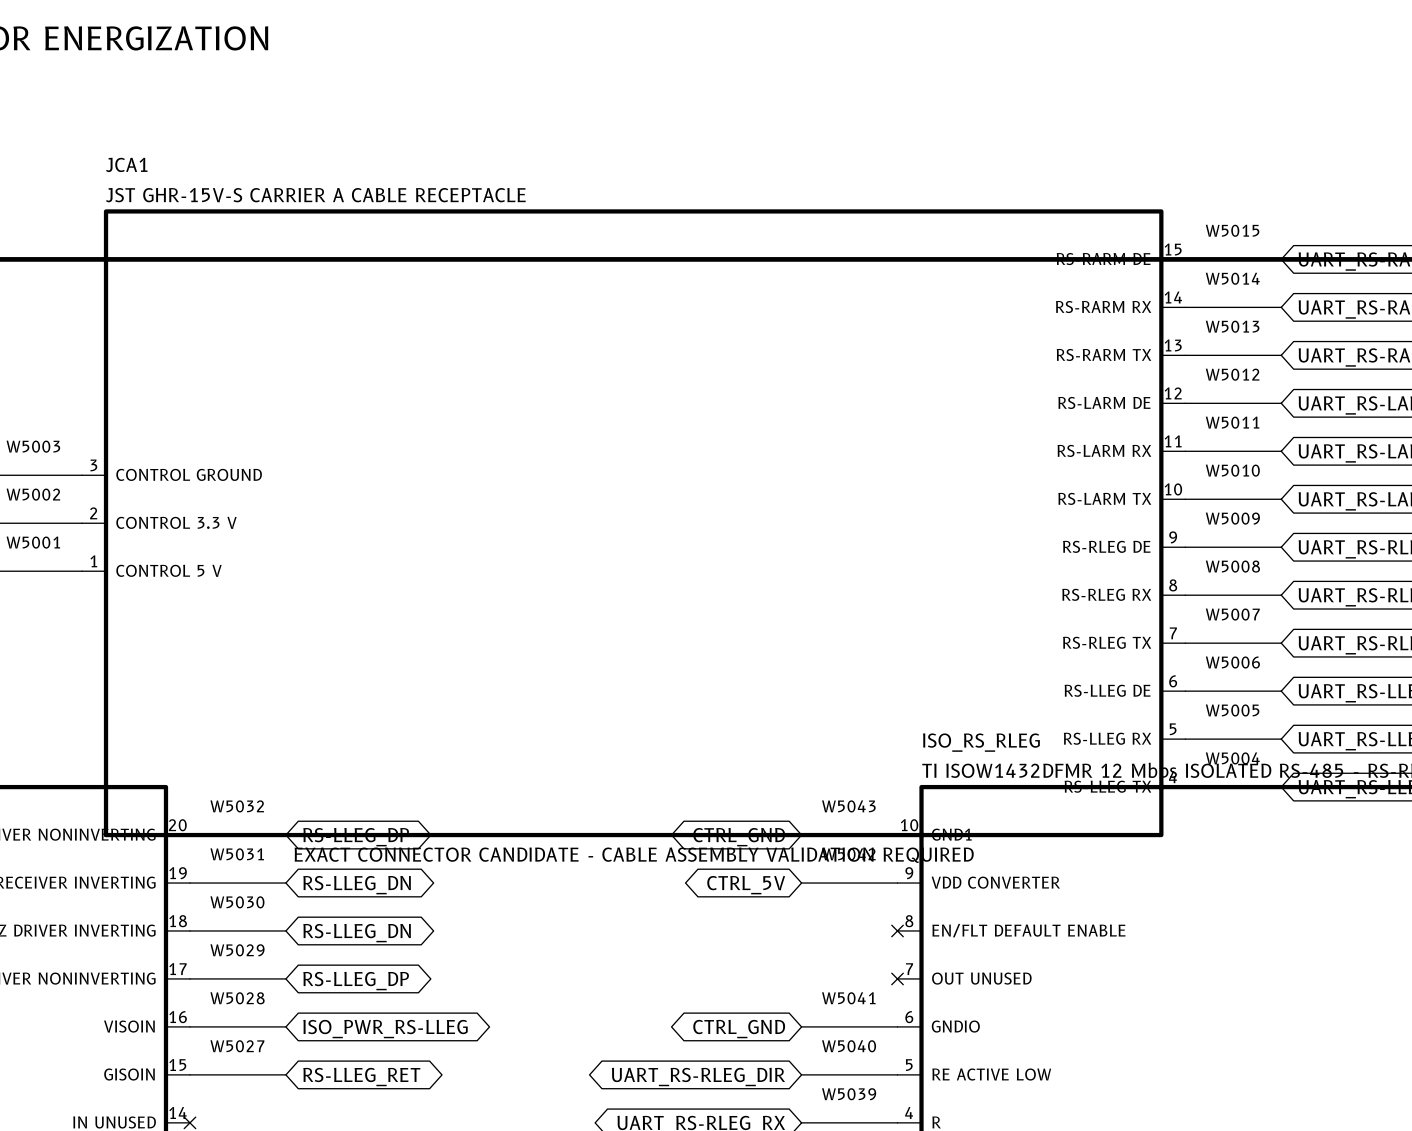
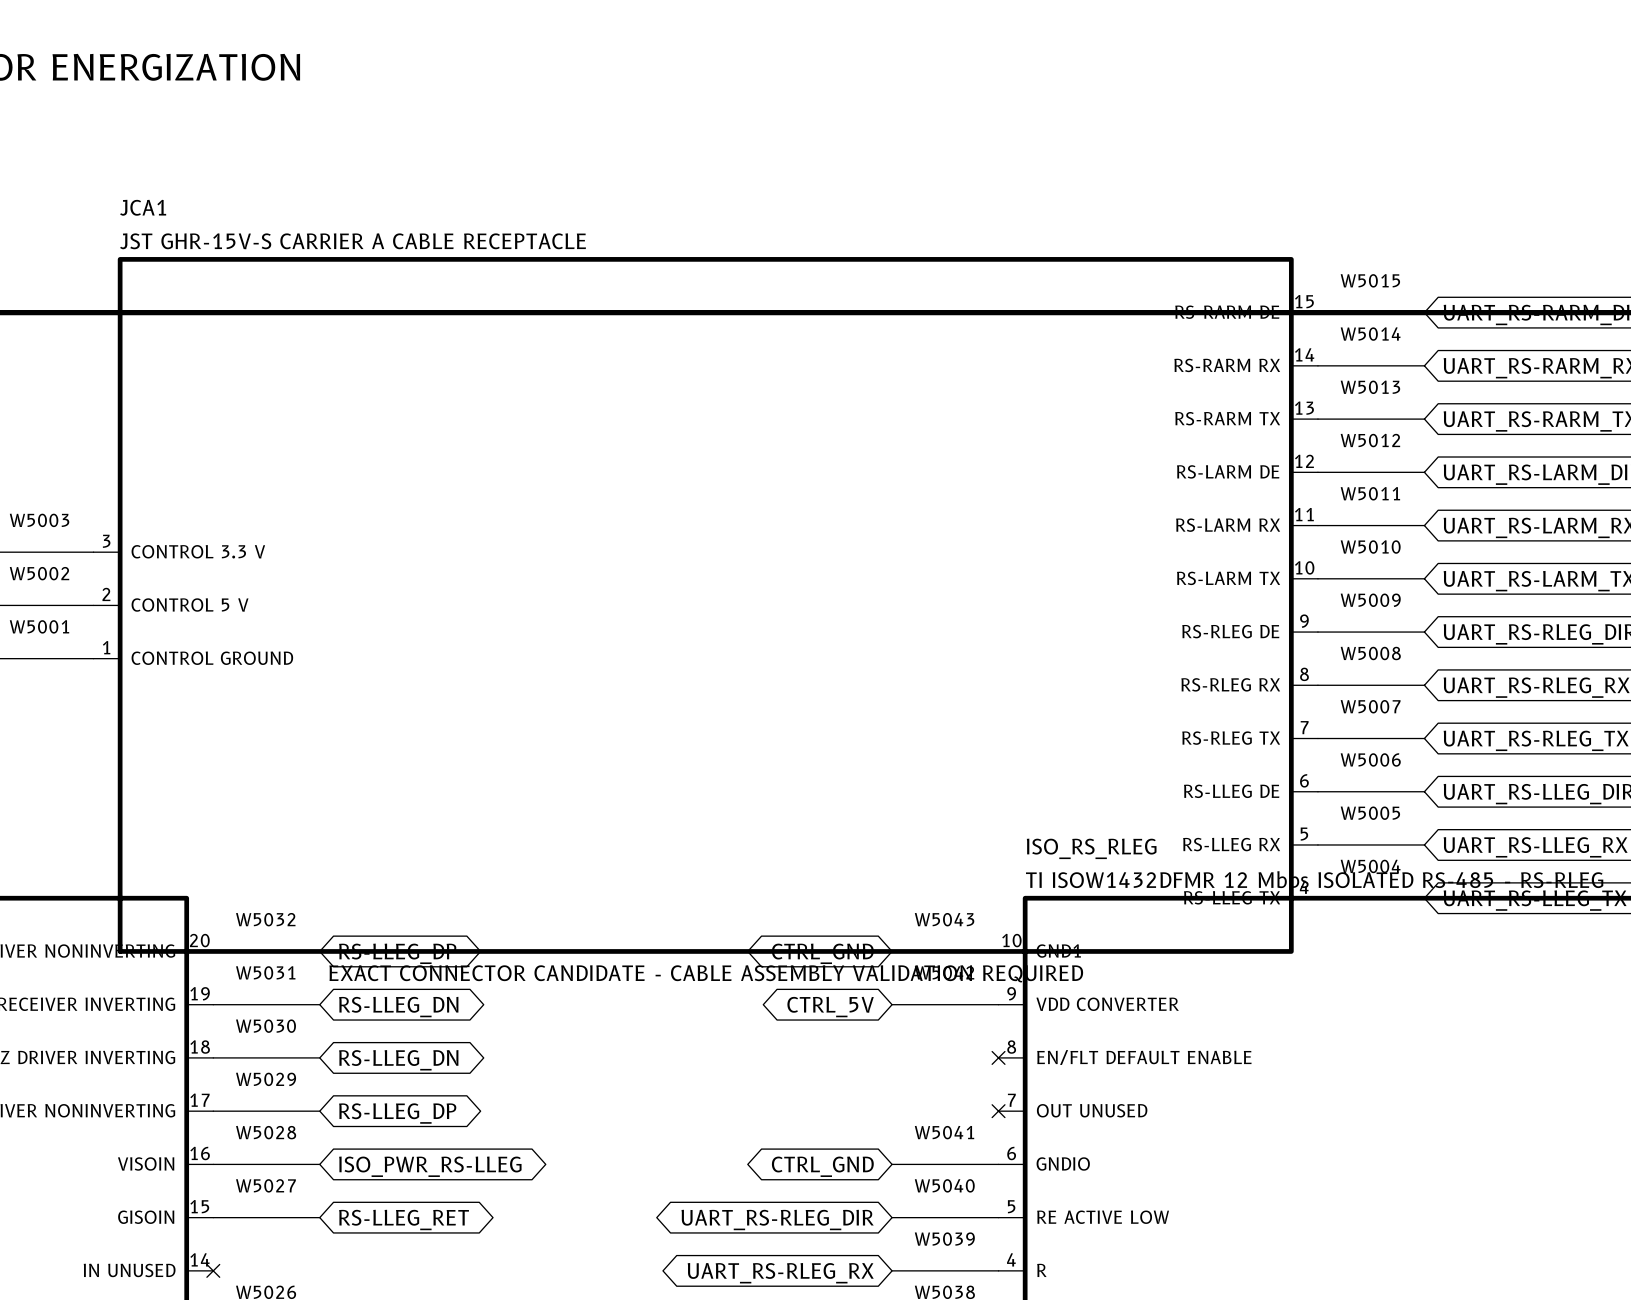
JCA1 pin name: CONTROL GROUND (189, 474) -> CONTROL 3.3 V (198, 551)
JCA1 pin name: CONTROL 3.3 V (176, 522) -> CONTROL 5 V (190, 605)
JCA1 pin name: CONTROL 5 V (168, 570) -> CONTROL GROUND (212, 658)

